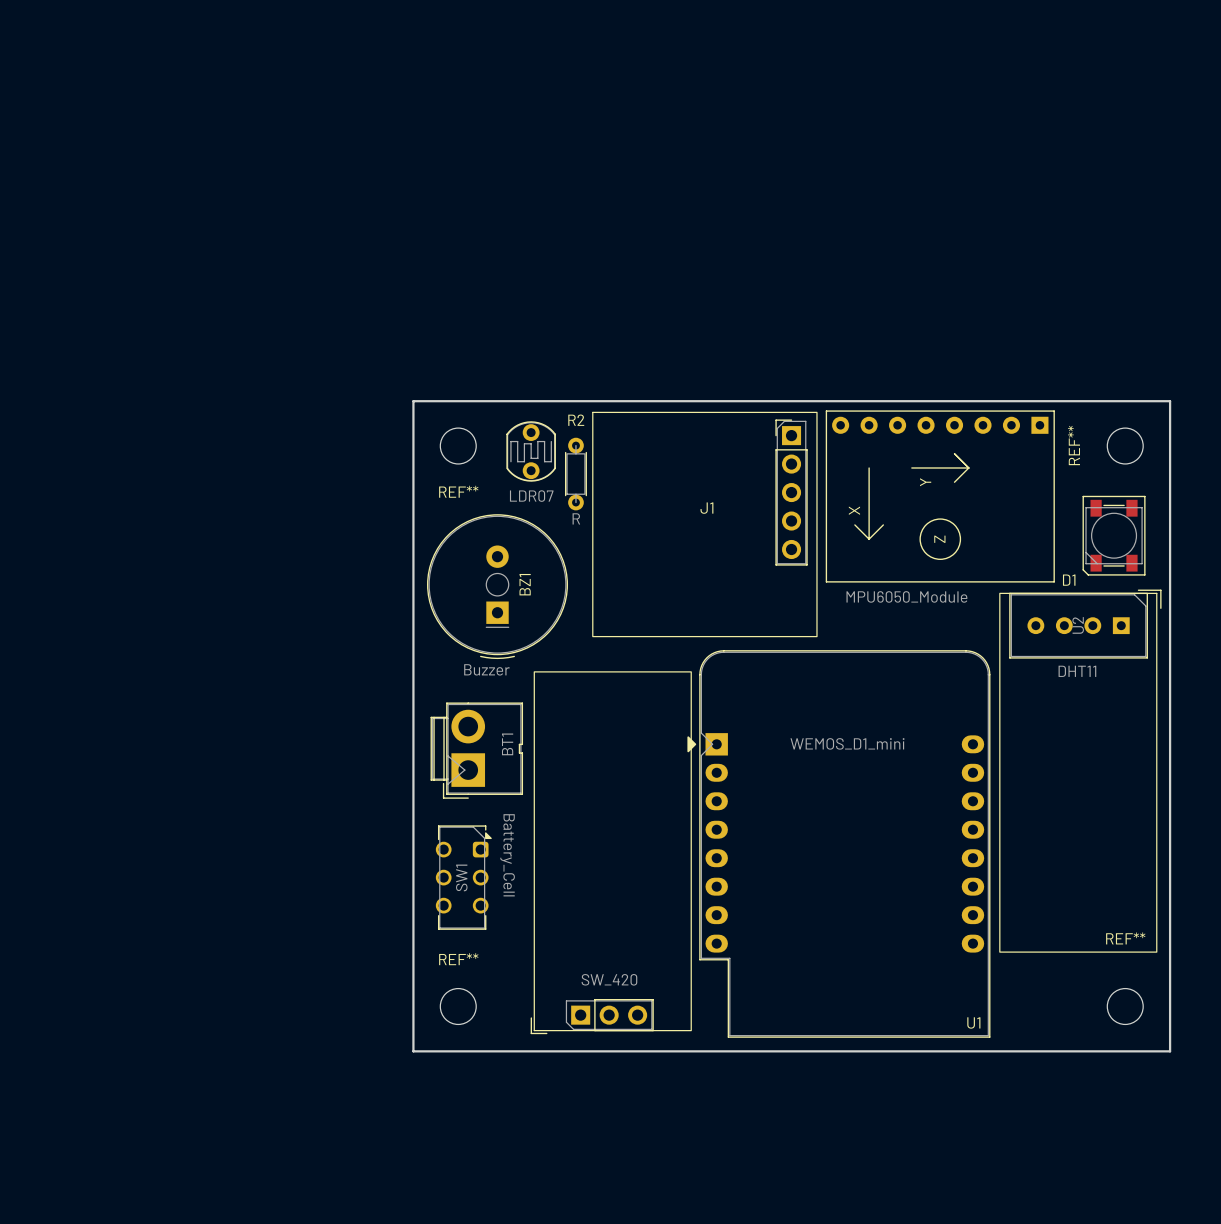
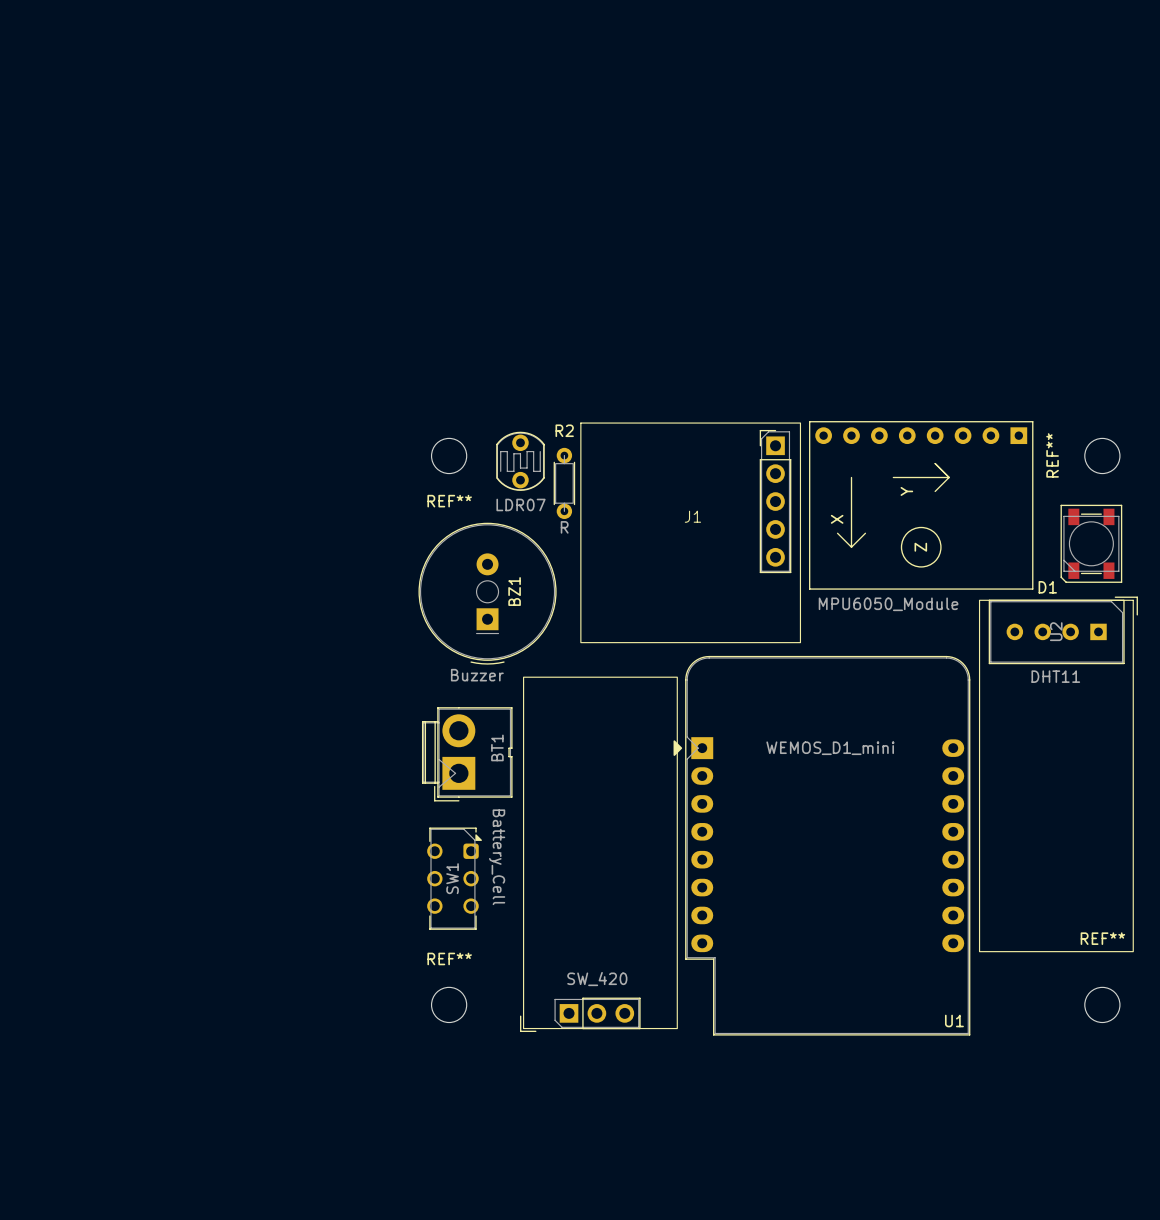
board edge: (413, 401) (1170, 401) (1170, 1051) (413, 1051) (413, 401) -> none

